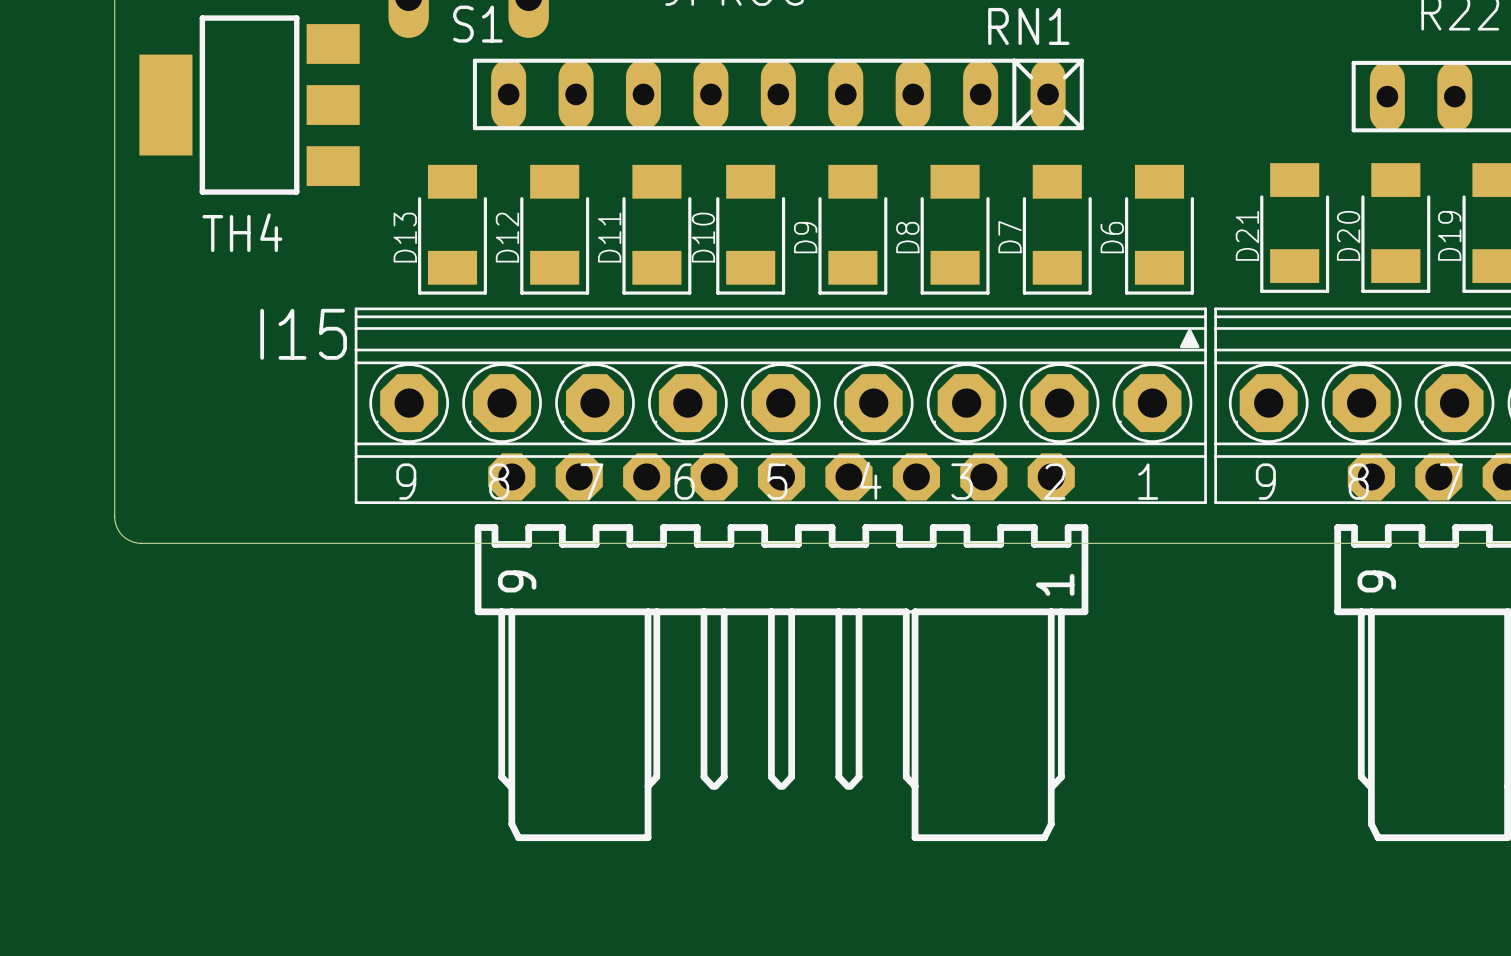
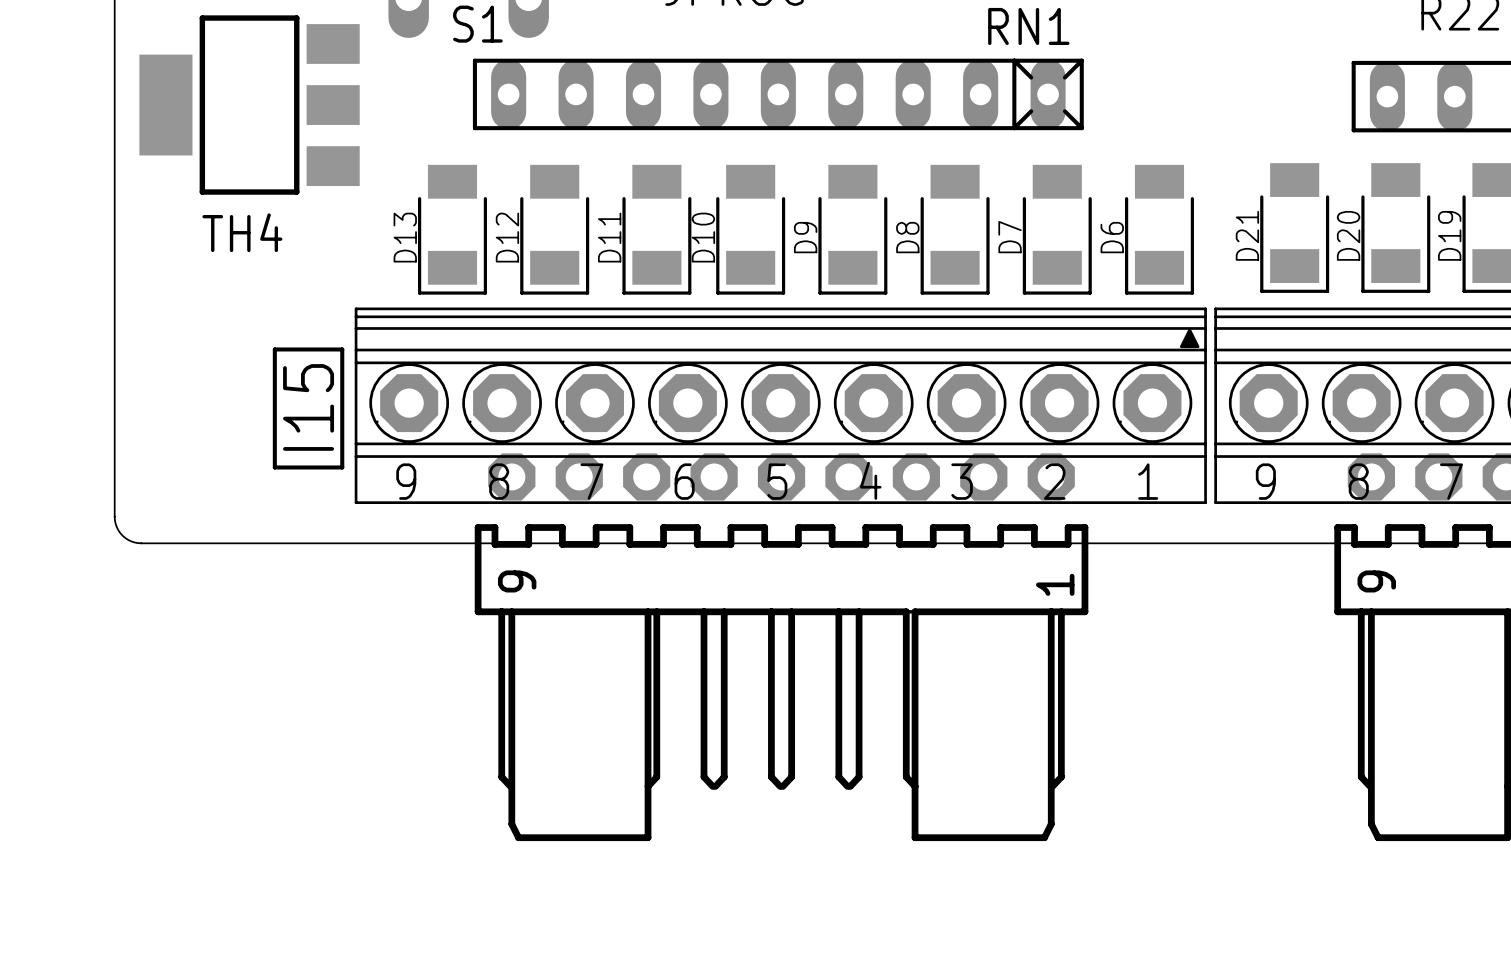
text rotation: 0° (303, 334) -> 90° counterclockwise (308, 407)
line: none -> (274, 349) (342, 349) (342, 467) (274, 467) (274, 349)

